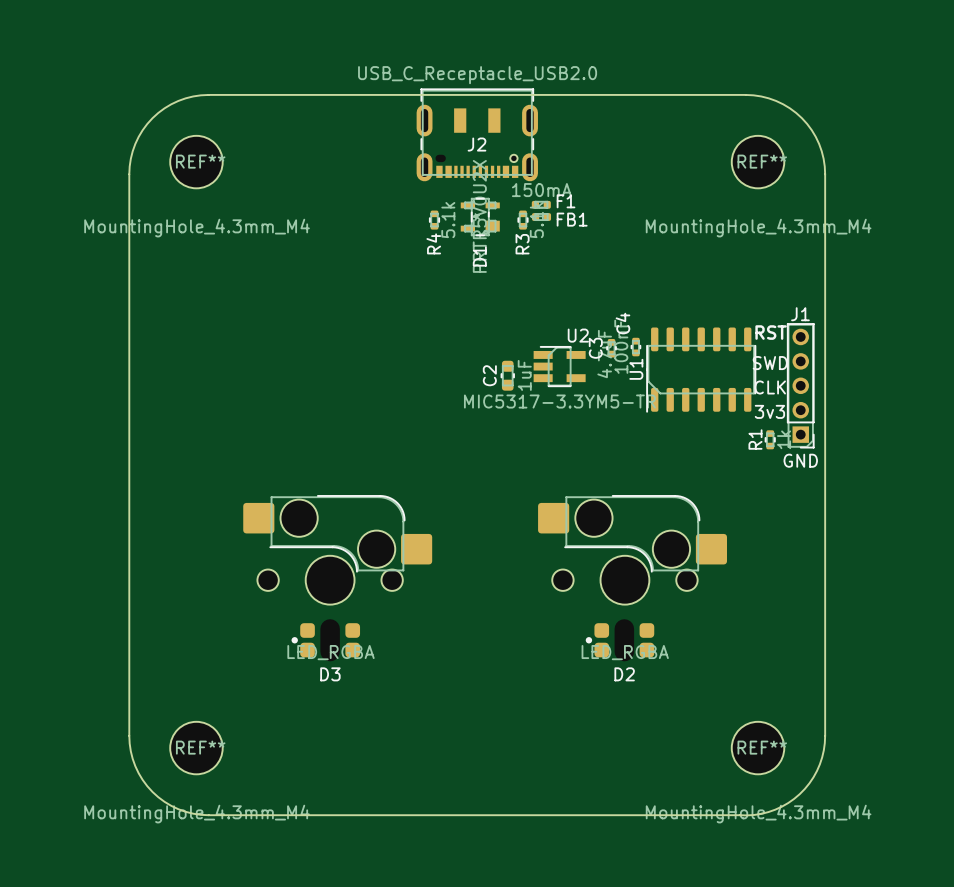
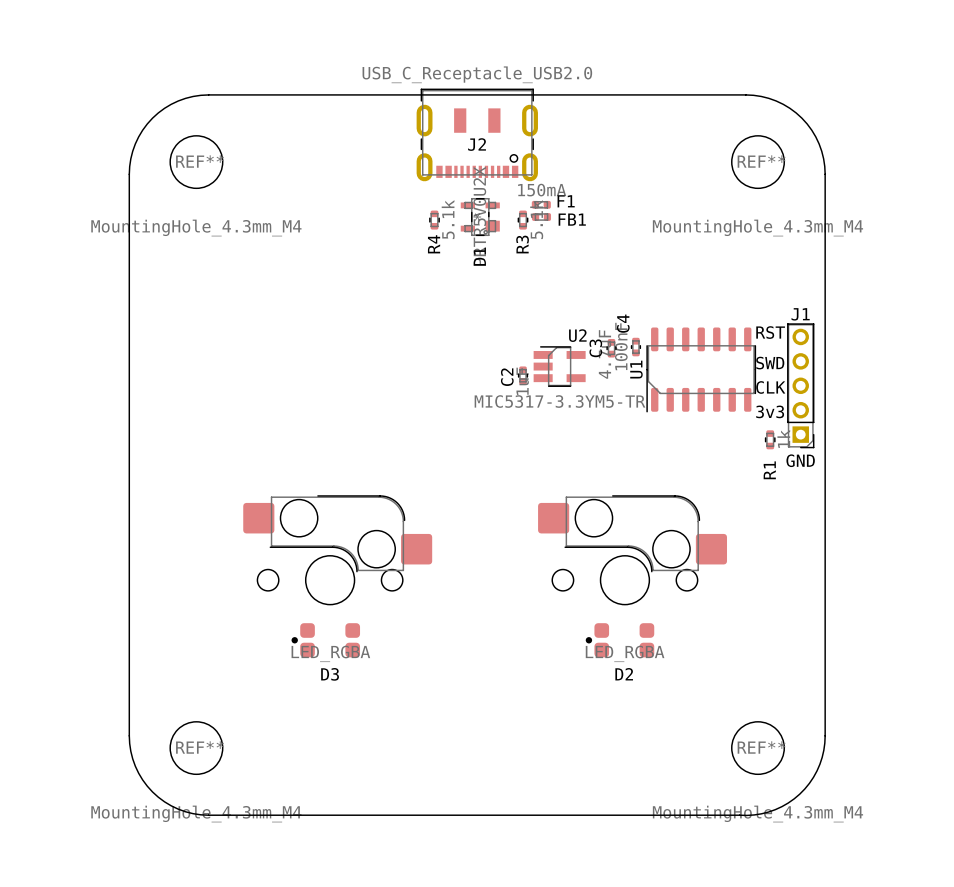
C2 footprint: [500, 360, 515, 391] -> [517, 366, 529, 386]
R1 name position: R1 (755, 439) -> R1 (769, 470)

